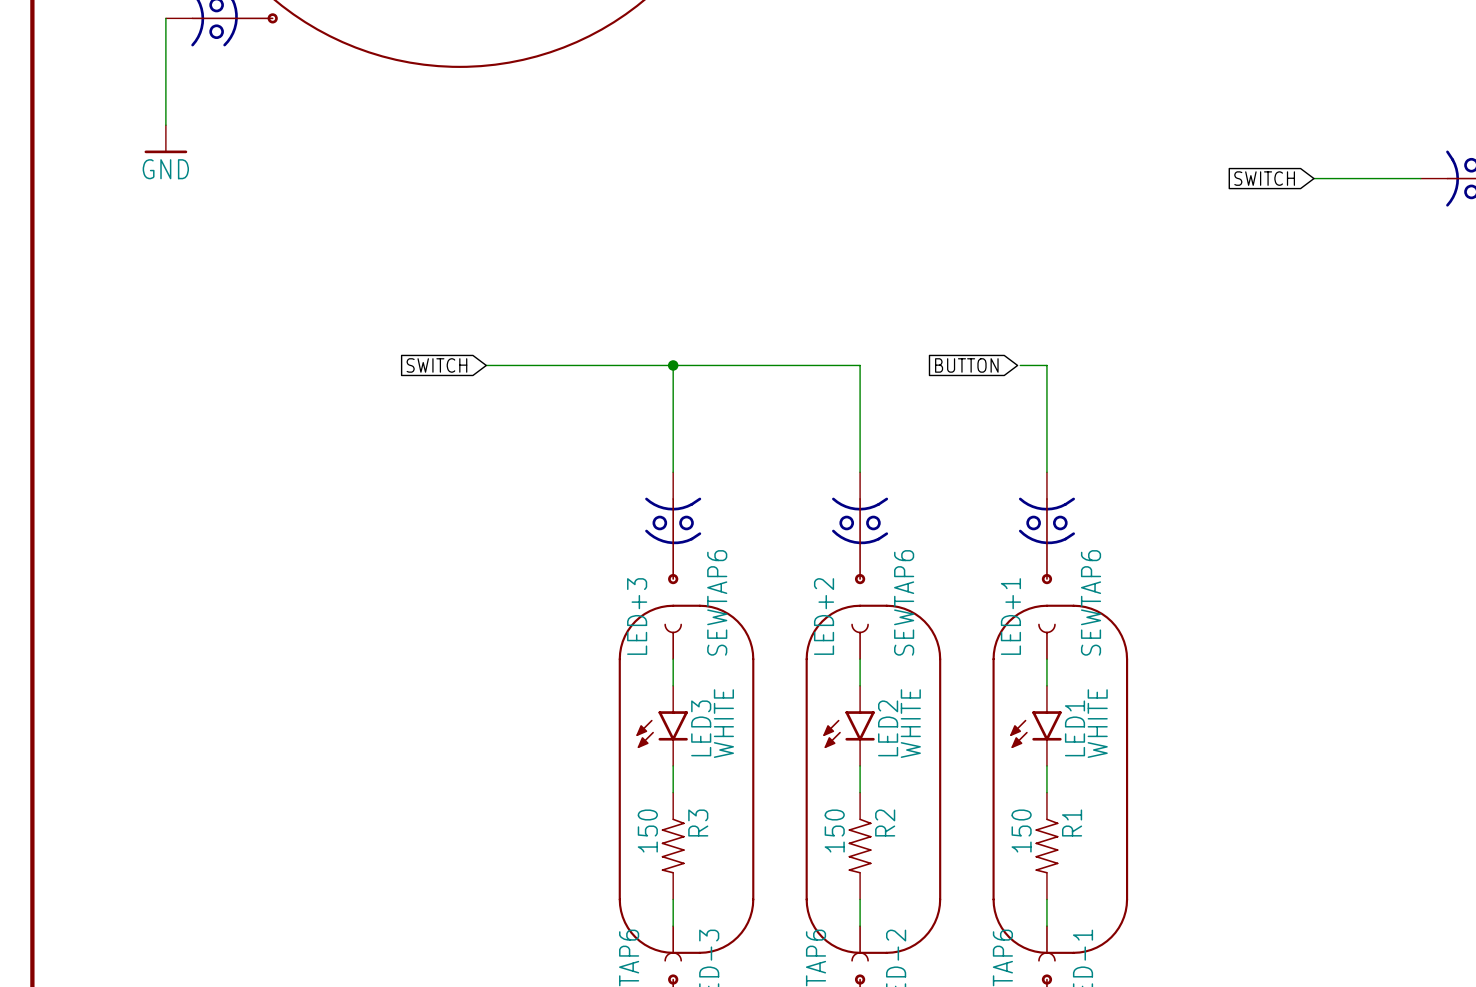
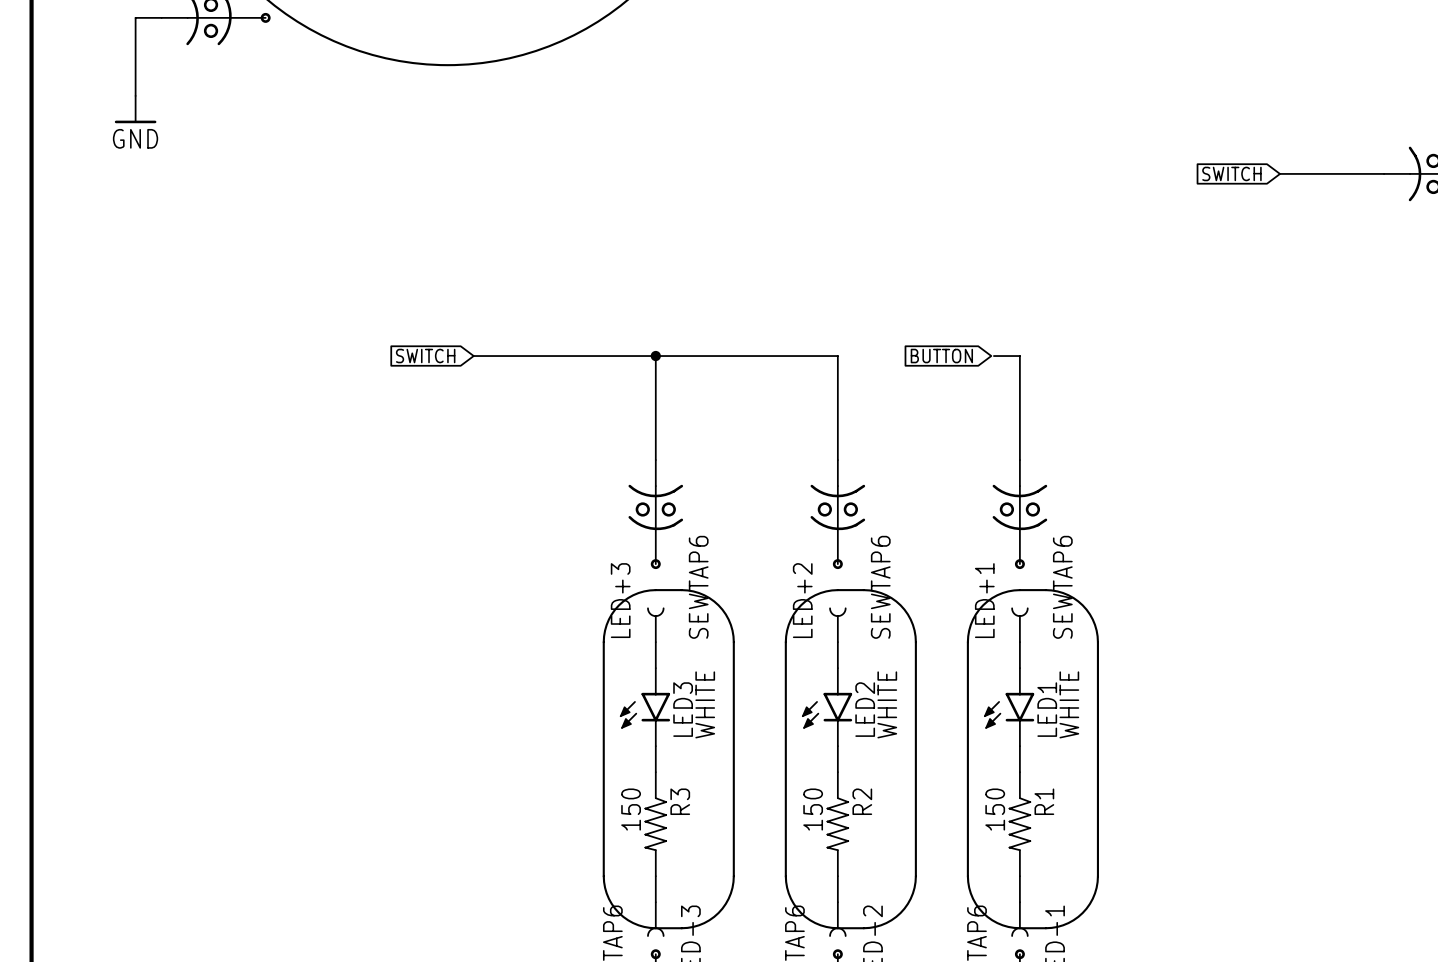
wire: (165, 18) (165, 125) -> (161, 17) (135, 17) (135, 95)
power symbol position: GND (165, 139) -> GND (135, 109)

